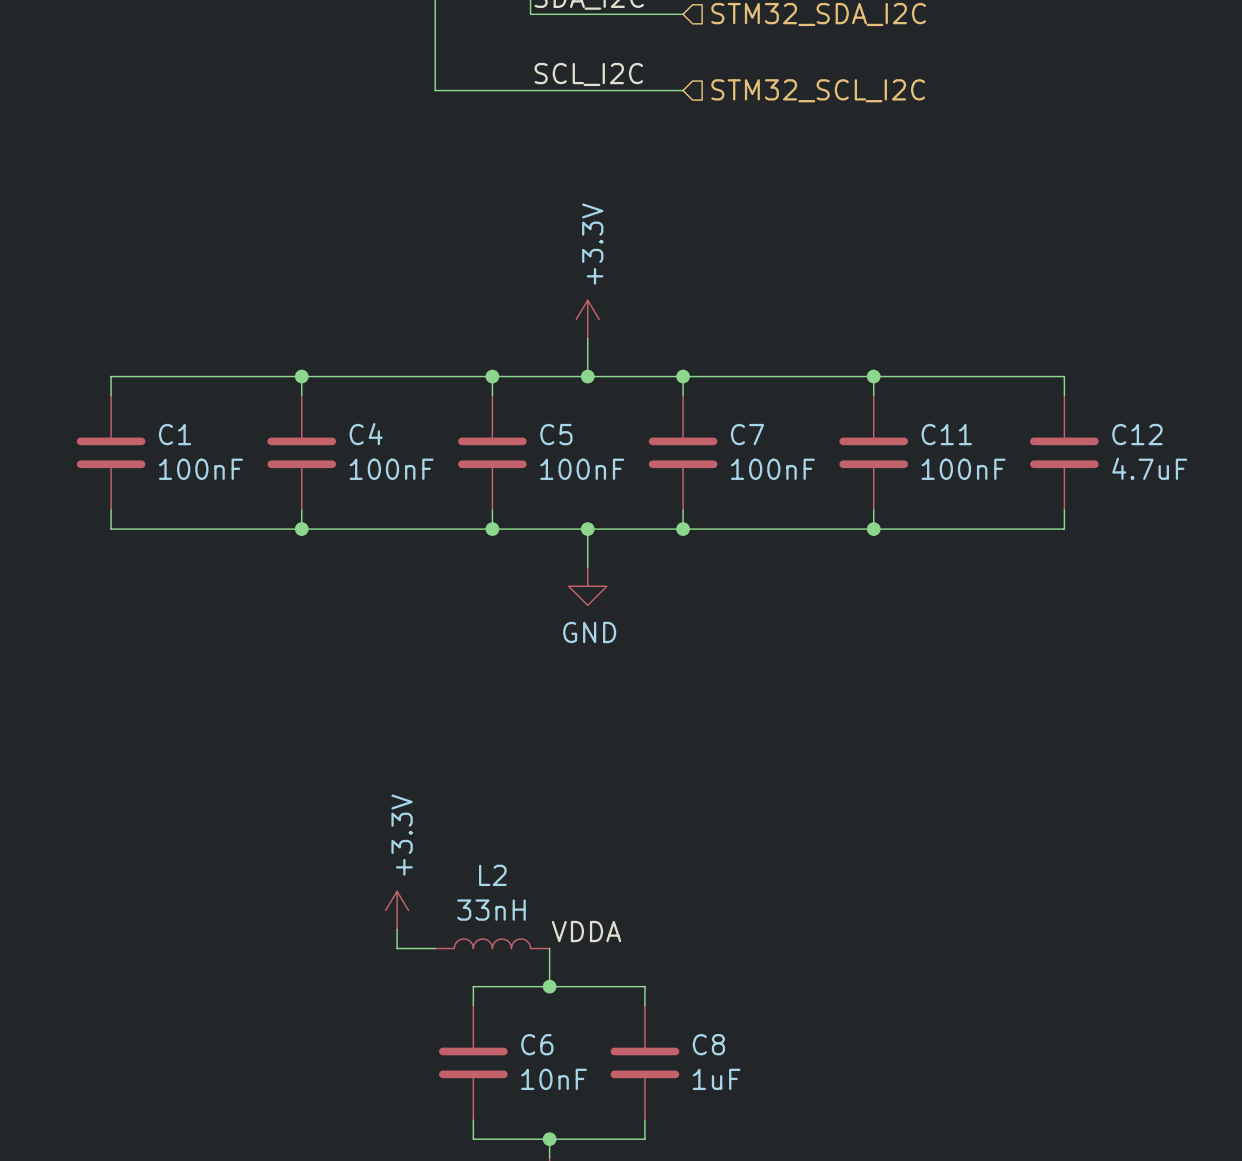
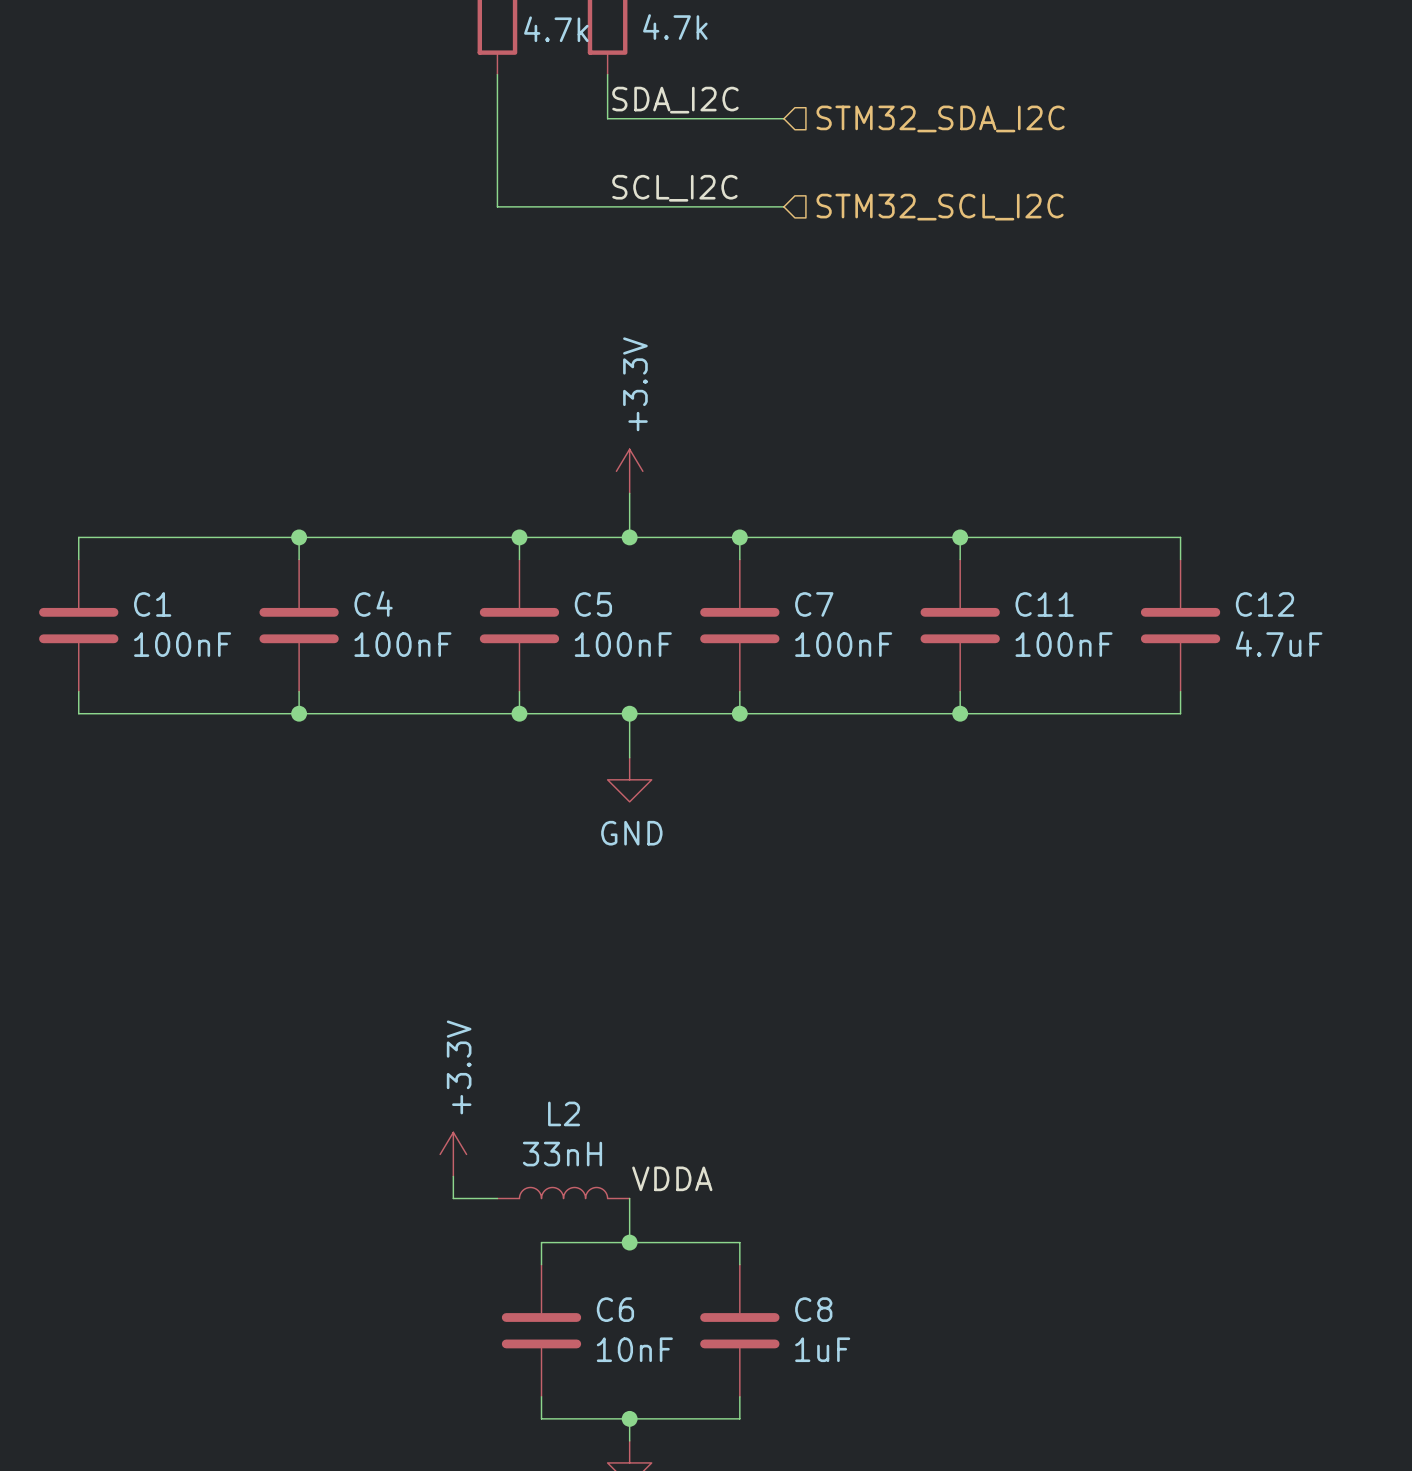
power symbol position: +3.3V (587, 319) -> +3.3V (629, 471)
wire: (587, 338) (587, 376) -> (629, 493) (629, 537)
wire: (111, 376) (111, 395) -> (122, 537) (78, 537) (78, 559)
wire: (301, 376) (301, 395) -> (299, 537) (299, 559)
junction position: (301, 376) -> (299, 537)
junction: none -> (519, 537)
wire: (492, 376) (492, 395) -> (519, 537) (519, 559)
junction: (492, 376) -> none
junction: none -> (629, 537)
junction: (587, 376) -> none
junction: none -> (739, 537)
wire: (683, 376) (683, 395) -> (739, 537) (739, 559)
junction: (683, 376) -> none
wire: (873, 376) (873, 395) -> (960, 537) (960, 559)
junction position: (873, 376) -> (960, 537)
wire: (1026, 376) (1064, 376) (1064, 395) -> (1180, 537) (1180, 559)
C1 position: (111, 452) -> (78, 625)
C4 position: (301, 452) -> (299, 625)
C5 position: (492, 452) -> (519, 625)
C7 position: (683, 452) -> (739, 625)
C11 position: (873, 452) -> (960, 625)
C12 position: (1064, 452) -> (1180, 625)
wire: (111, 510) (111, 529) -> (78, 691) (78, 713) (122, 713)
wire: (301, 510) (301, 529) -> (299, 691) (299, 713)
wire: (492, 510) (492, 529) -> (519, 691) (519, 713)
wire: (683, 510) (683, 529) -> (739, 691) (739, 713)
wire: (873, 510) (873, 529) -> (960, 691) (960, 713)
wire: (1064, 510) (1064, 529) (1026, 529) -> (1180, 691) (1180, 713)
junction position: (301, 529) -> (299, 713)
junction: none -> (519, 713)
junction: (492, 529) -> none
junction: none -> (629, 713)
wire: (587, 529) (587, 567) -> (629, 713) (629, 757)
junction: (587, 529) -> none
junction: none -> (739, 713)
junction: (683, 529) -> none
junction position: (873, 529) -> (960, 713)
power symbol position: GND (587, 586) -> GND (629, 779)

